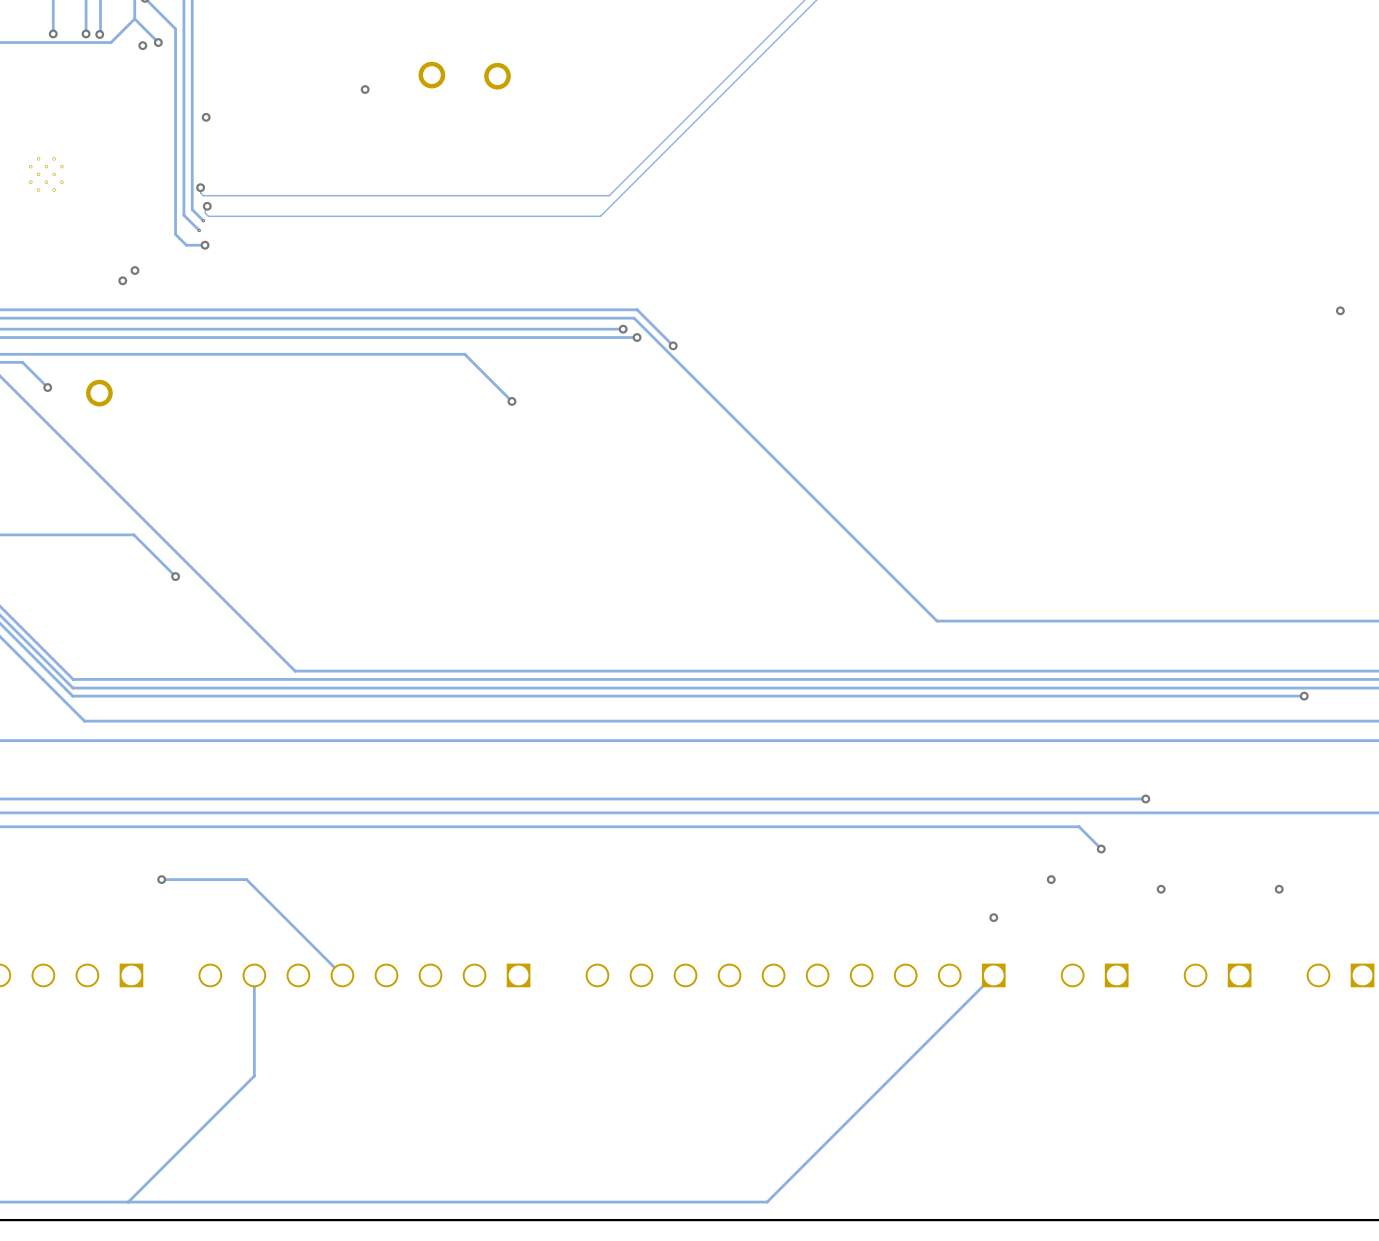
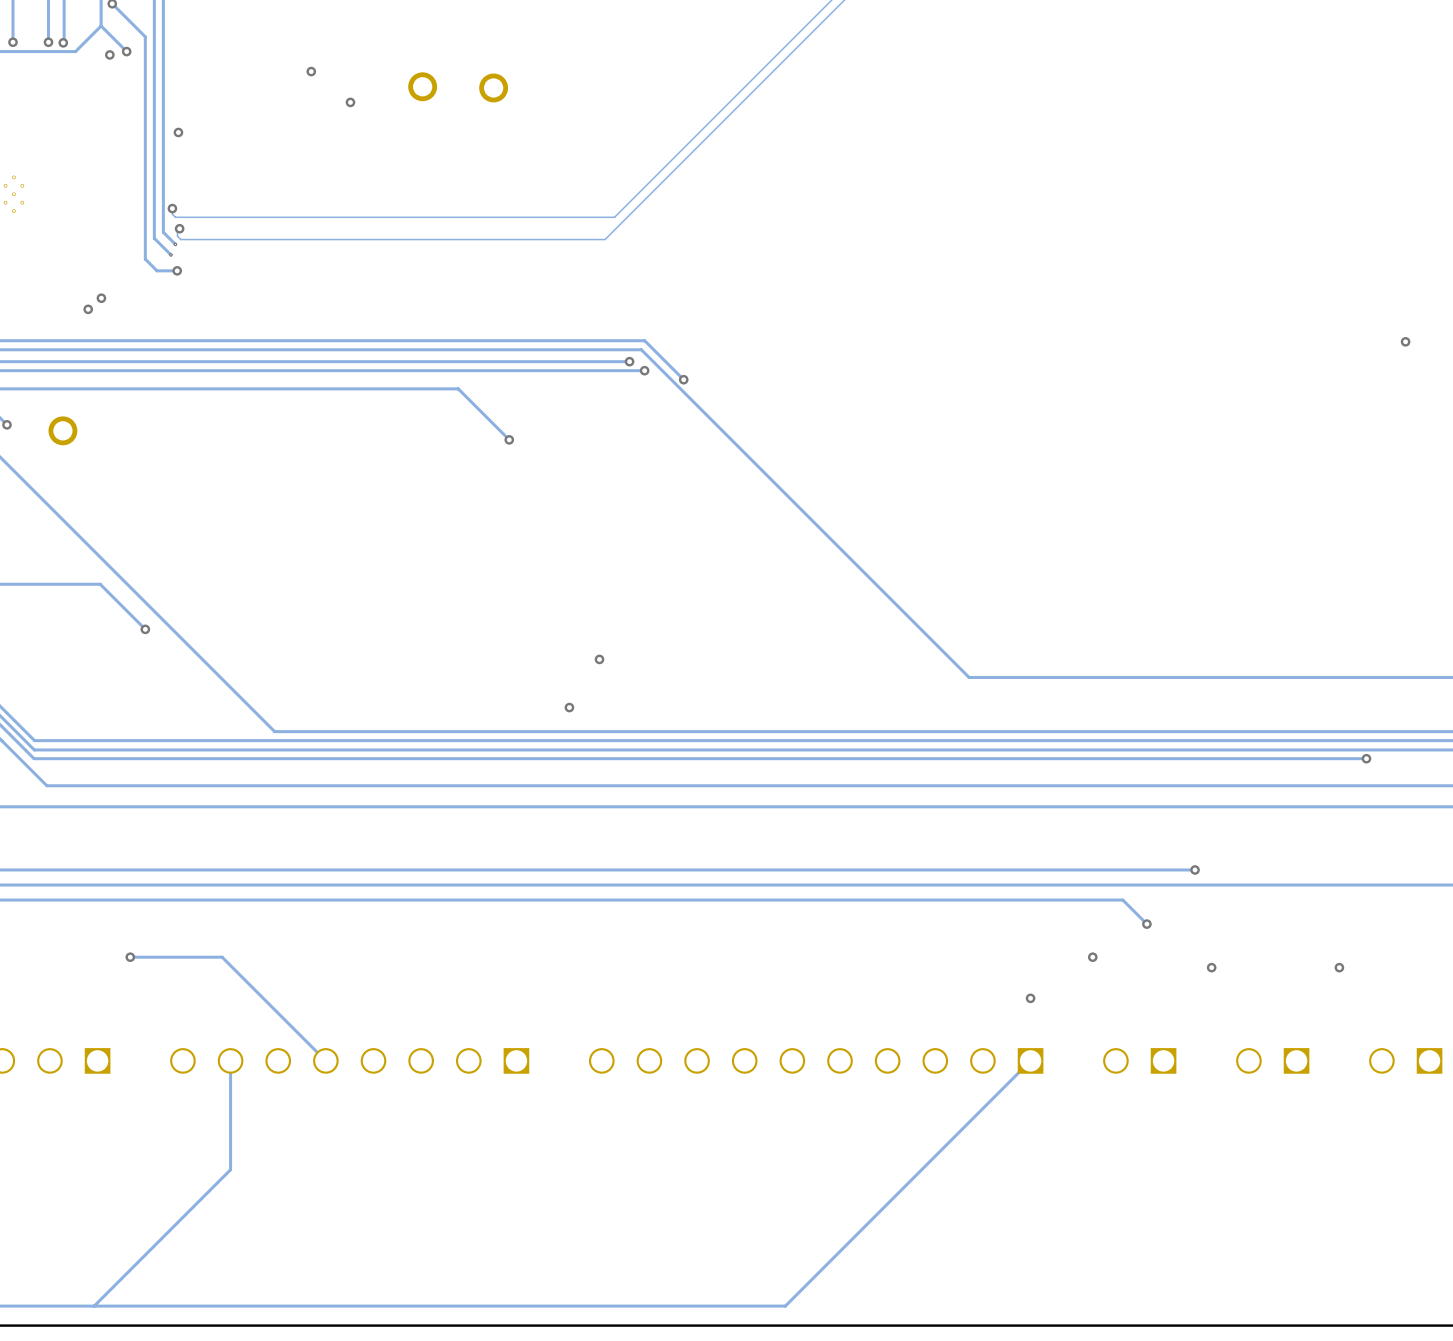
via: none -> (311, 71)
via: none -> (599, 659)
via: none -> (569, 707)

